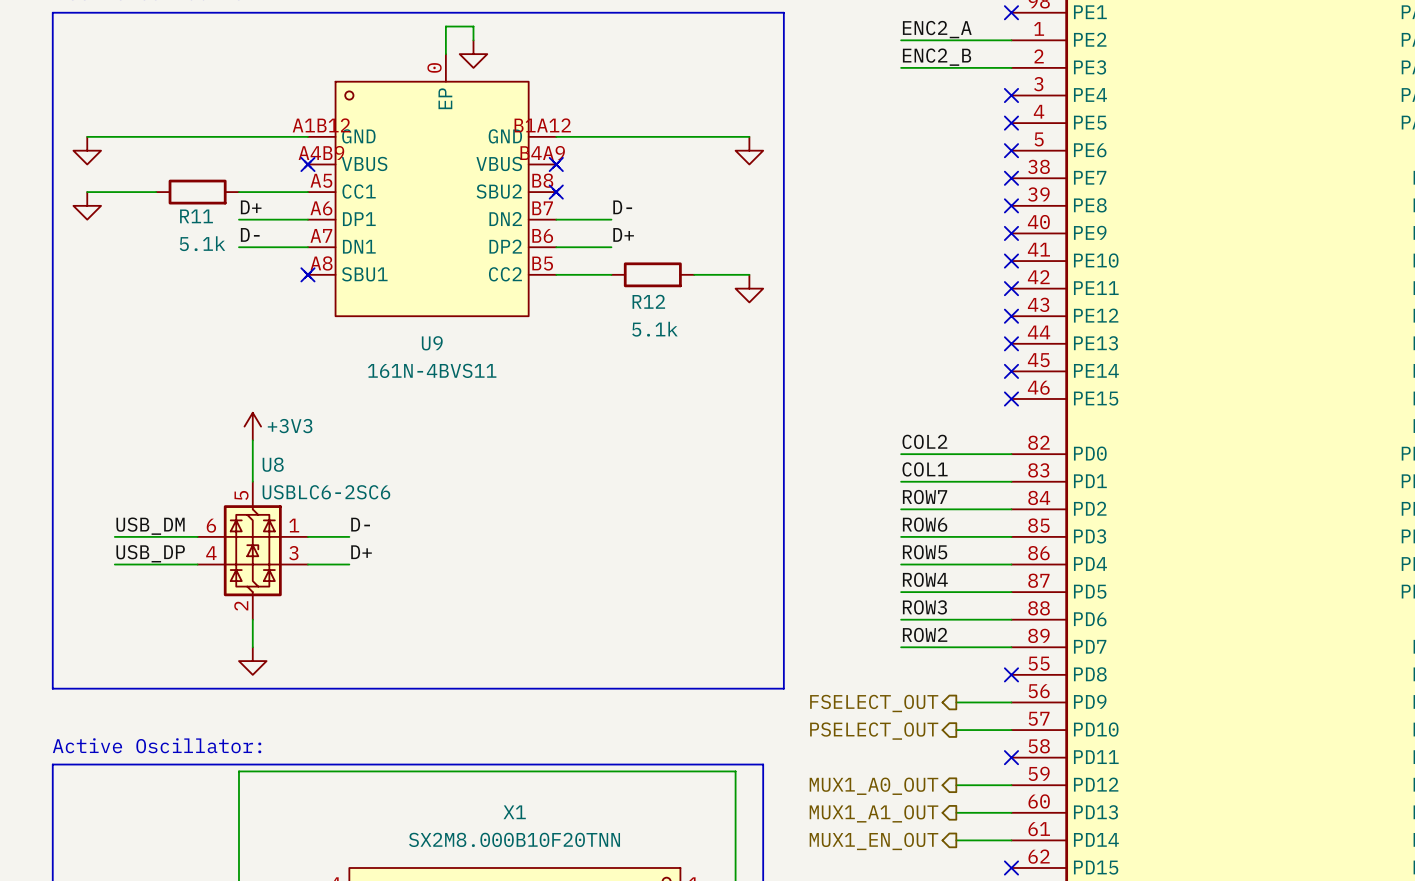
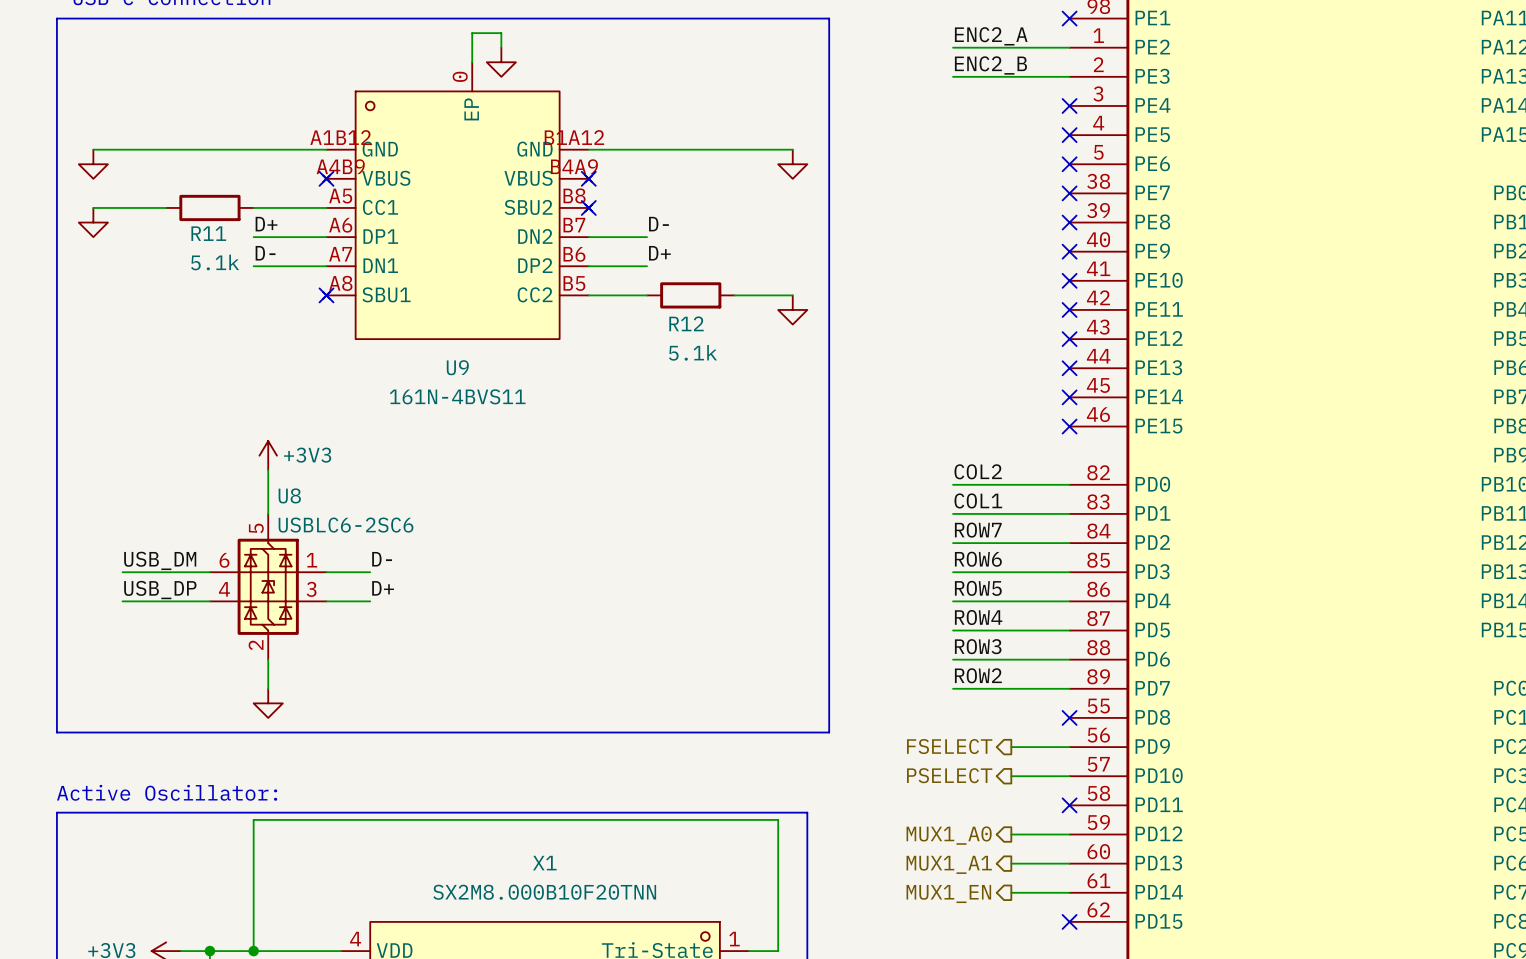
hierarchical label: FSELECT_OUT (874, 703) -> FSELECT (949, 746)
hierarchical label: PSELECT_OUT (874, 731) -> PSELECT (949, 775)
hierarchical label: MUX1_A0_OUT (873, 786) -> MUX1_A0 (949, 835)
hierarchical label: MUX1_A1_OUT (873, 813) -> MUX1_A1 (949, 864)
hierarchical label: MUX1_EN_OUT (873, 841) -> MUX1_EN (948, 894)

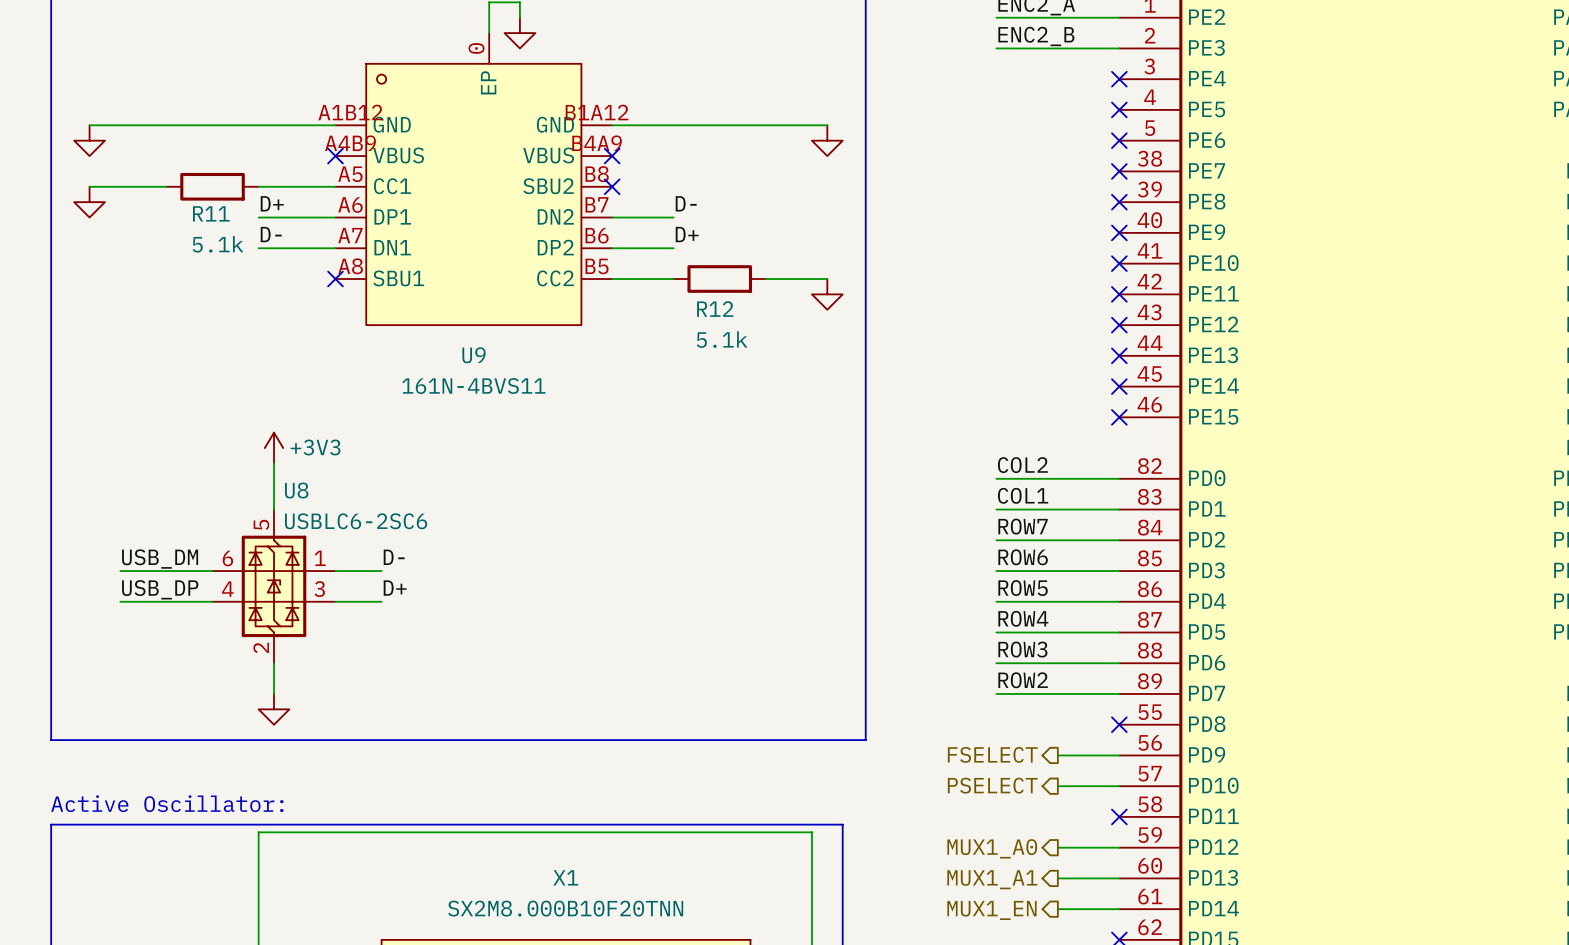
U9 symbol: [323, 62, 593, 340] -> [335, 33, 613, 326]

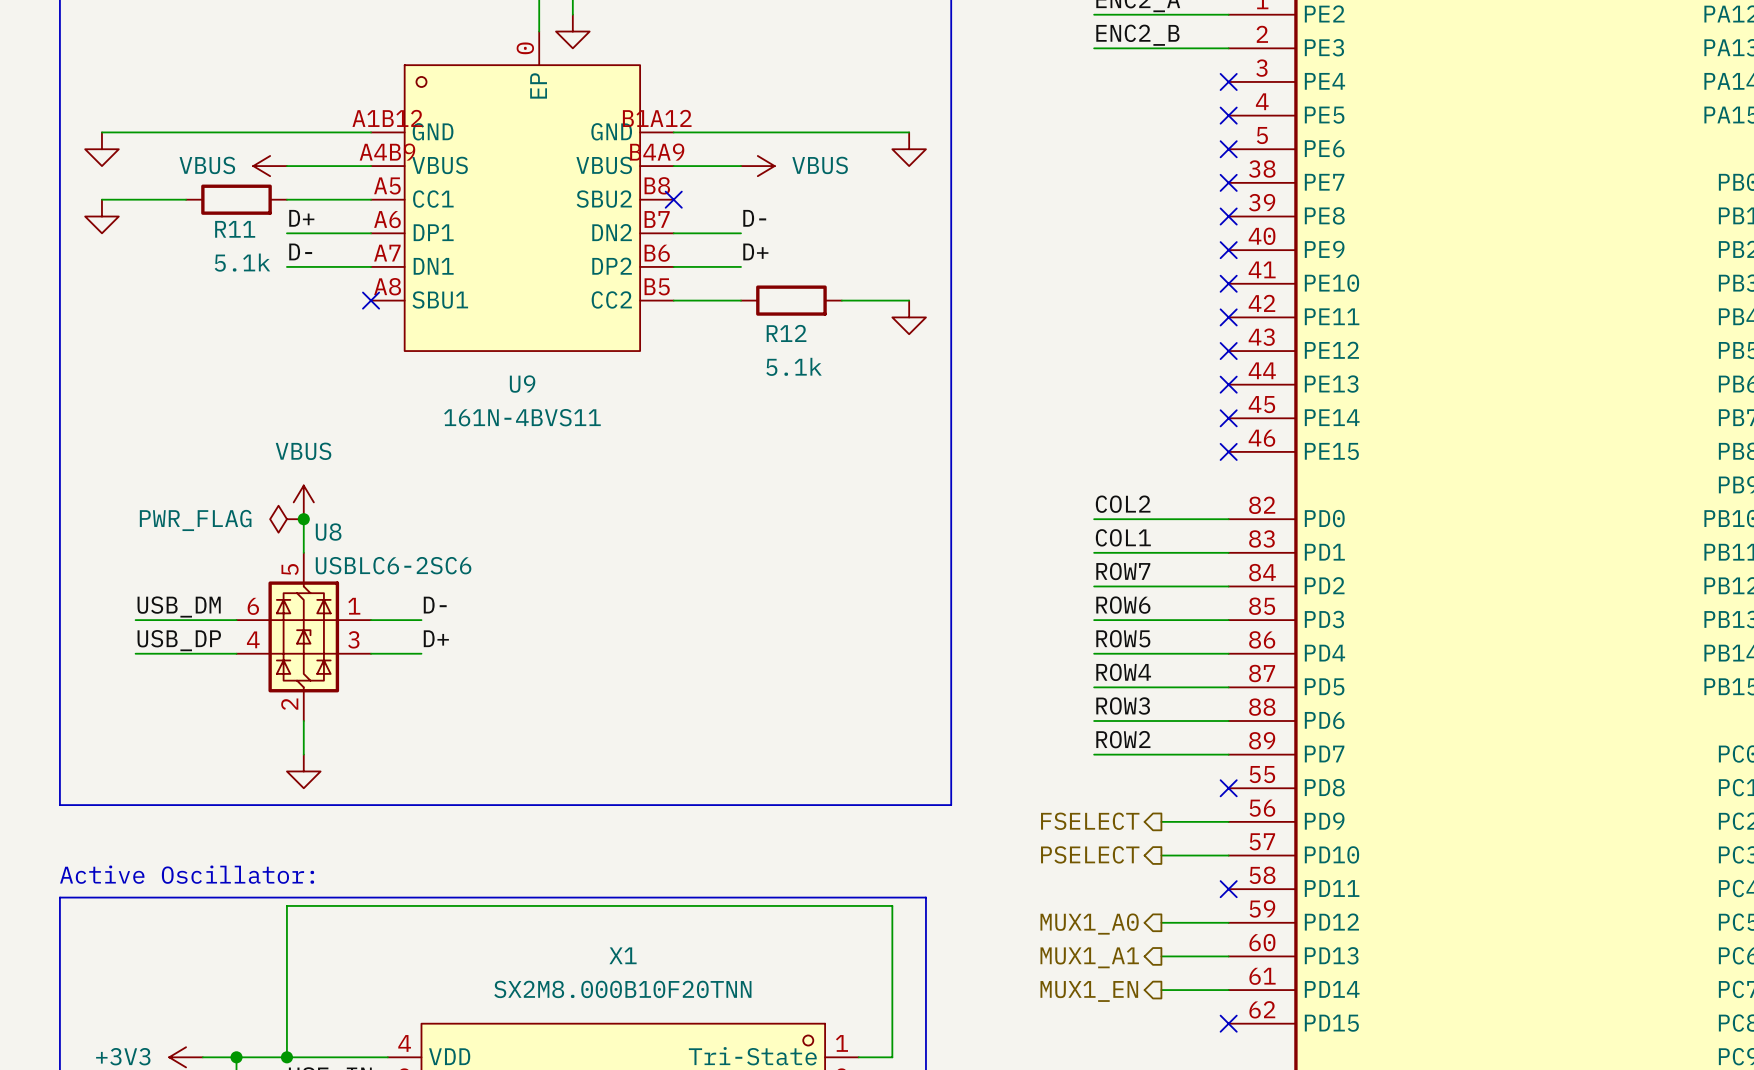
power symbol: none -> VBUS (270, 166)
wire: none -> (286, 166) (371, 166)
no-connect mark: (335, 156) -> none
wire: none -> (673, 166) (741, 166)
no-connect mark: (612, 156) -> none
power symbol: none -> VBUS (757, 166)
power symbol: +3V3 (274, 448) -> none
power symbol: none -> VBUS (303, 502)
power symbol: none -> PWR_FLAG (286, 519)
junction: none -> (303, 519)

